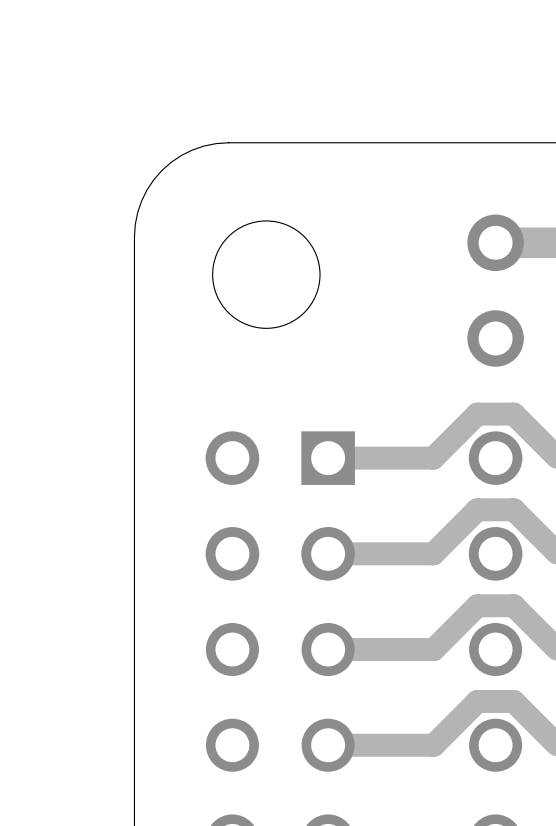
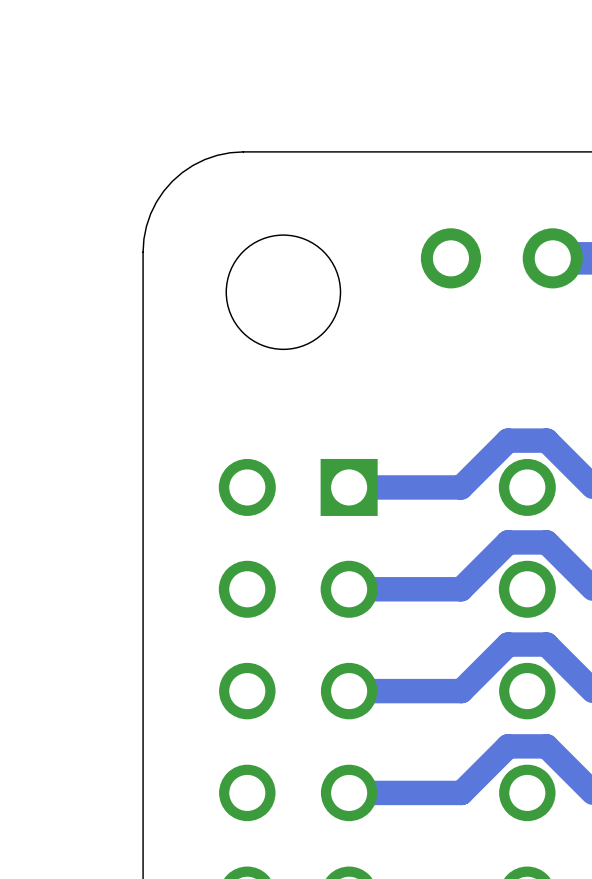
part rotation: 0° (495, 290) -> 90° clockwise (501, 258)

